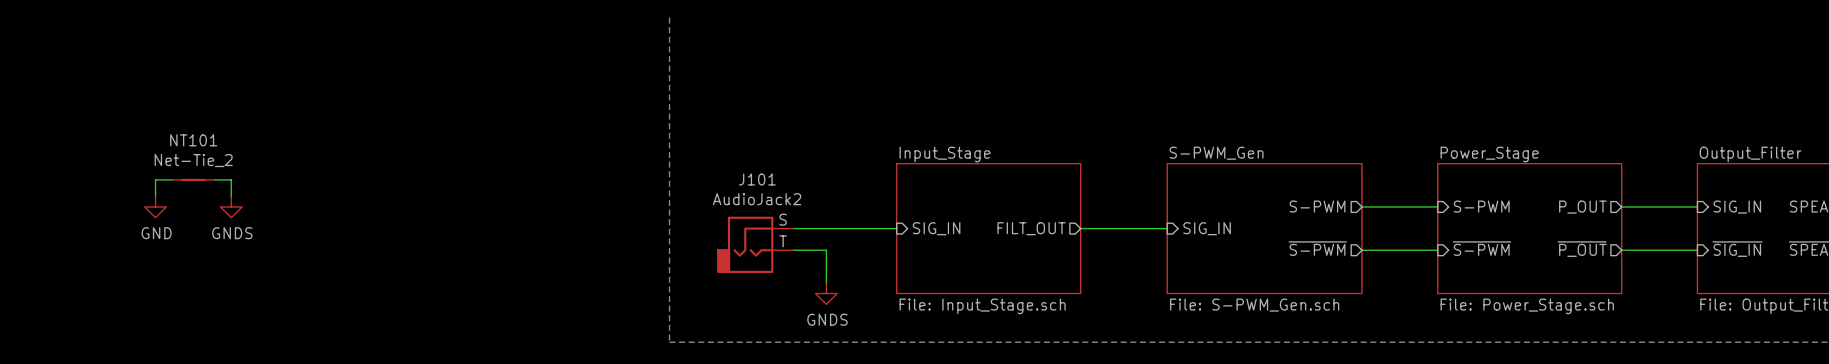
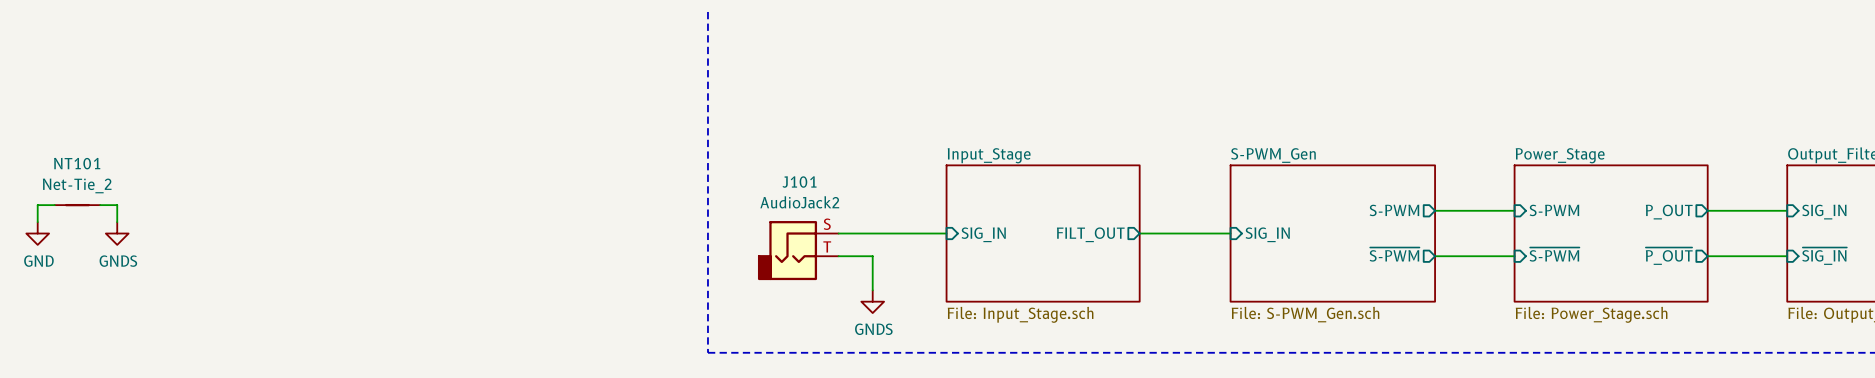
wire: (171, 179) (155, 179) (155, 196) -> (54, 205) (37, 205) (37, 222)
NT101 position: (193, 179) -> (77, 205)
wire: (215, 179) (231, 179) (231, 196) -> (100, 205) (117, 205) (117, 222)
power symbol position: GND (155, 206) -> GND (37, 233)
power symbol position: GNDS (231, 206) -> GNDS (117, 233)

